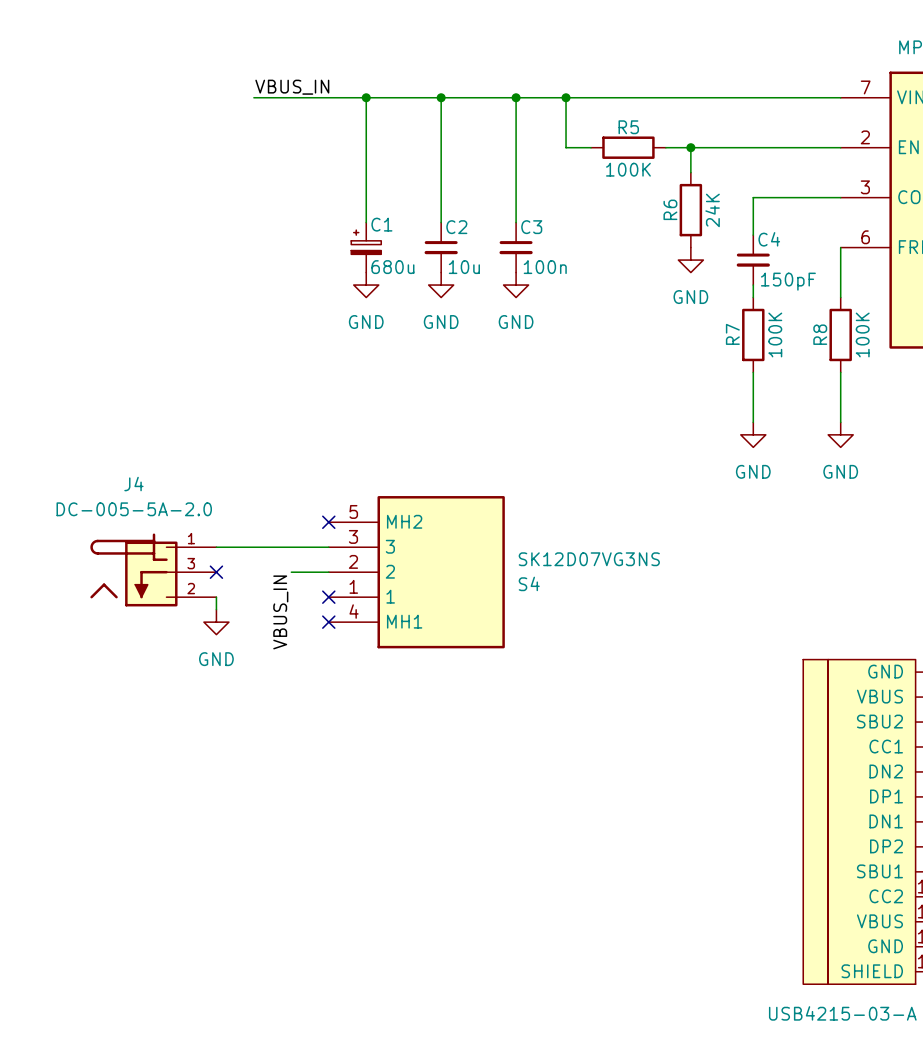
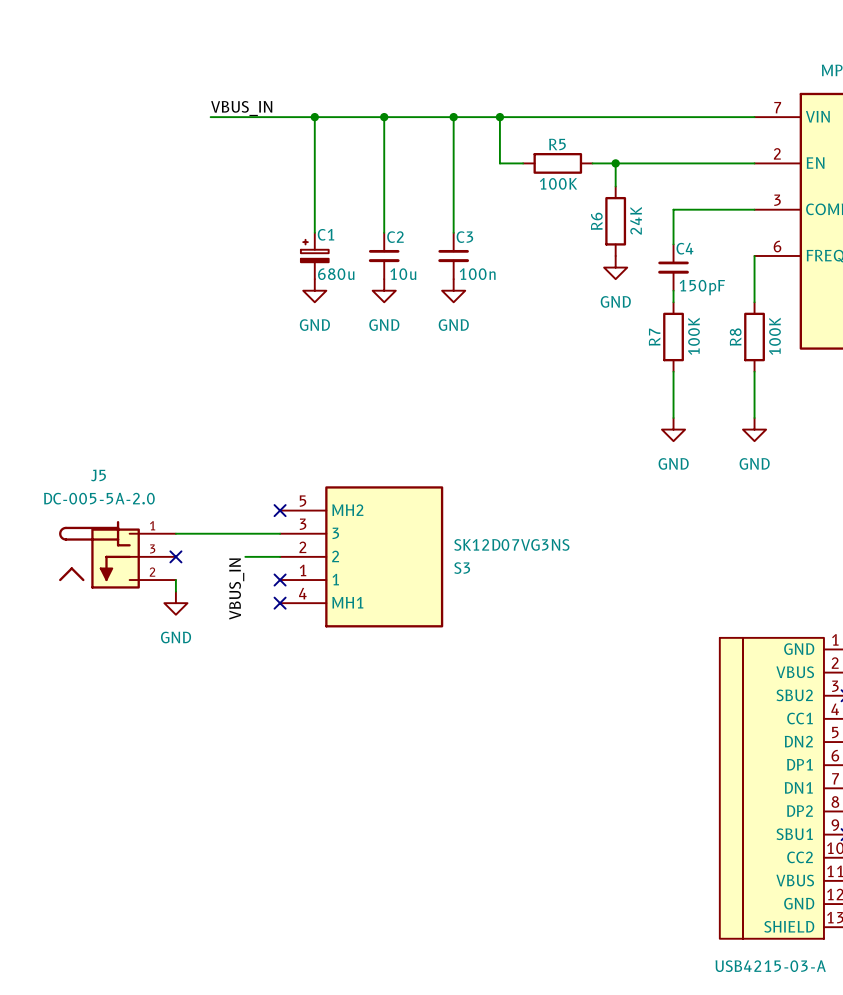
J4 name: J4 (133, 484) -> J5 (98, 475)
S4 name: S4 (529, 583) -> S3 (462, 568)

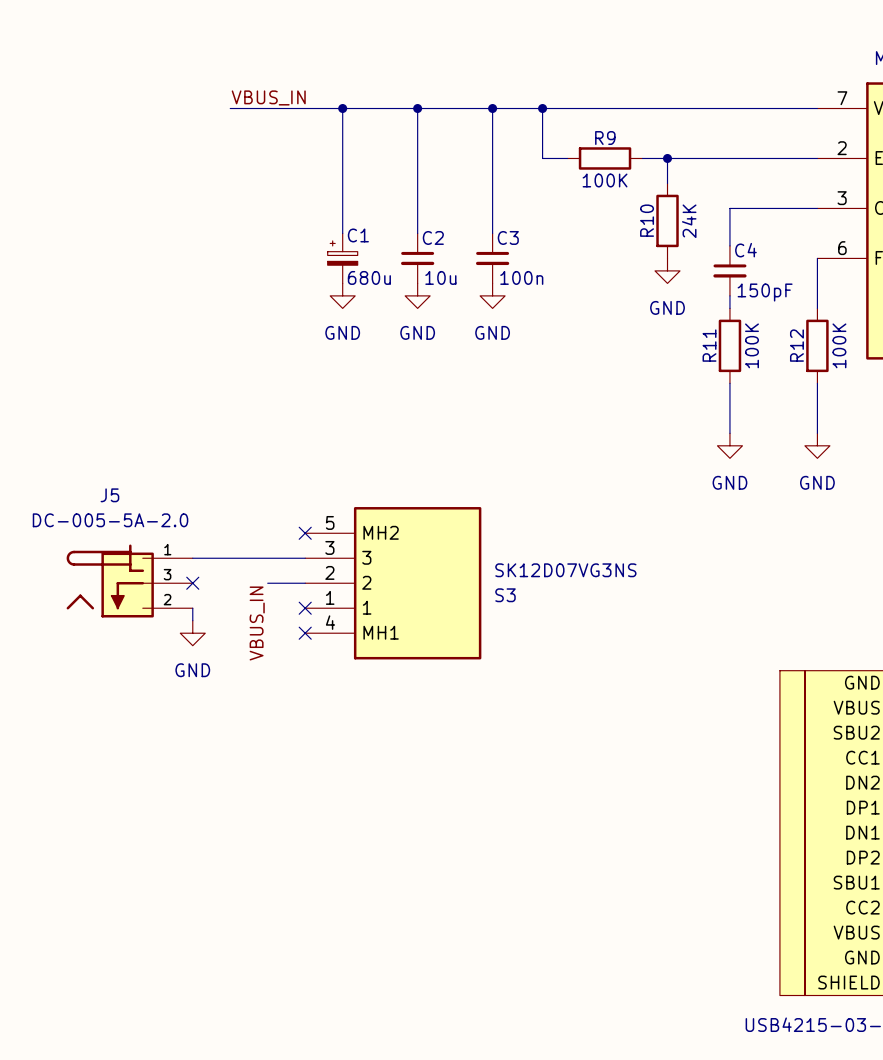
R5 name: R5 (557, 144) -> R9 (605, 138)
R6 name: R6 (596, 221) -> R10 (647, 220)
R7 name: R7 (654, 337) -> R11 (709, 345)
R8 name: R8 (735, 337) -> R12 (796, 345)

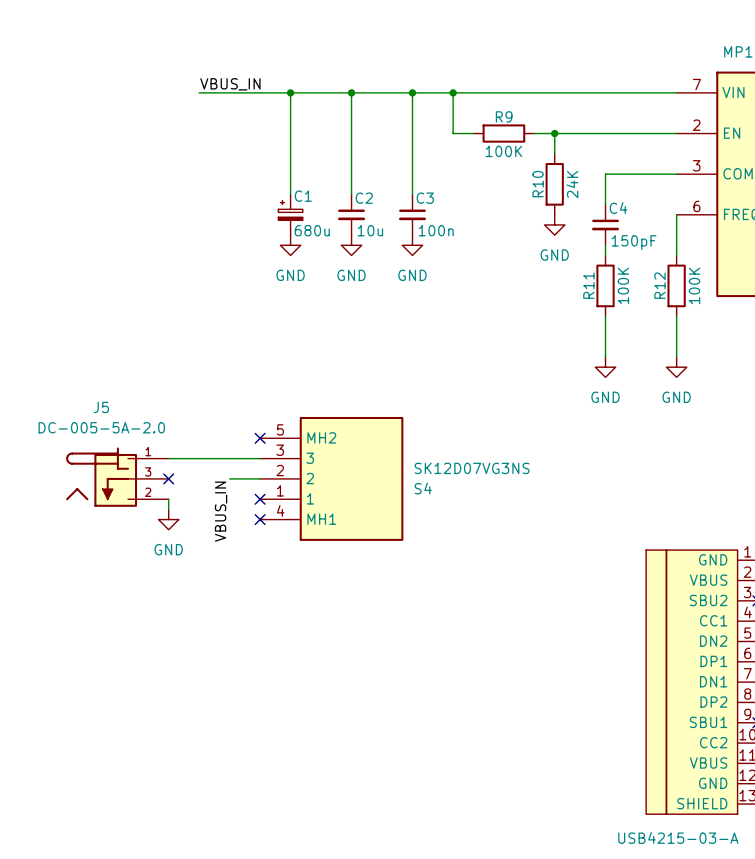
S3 name: S3 (505, 595) -> S4 (423, 488)

